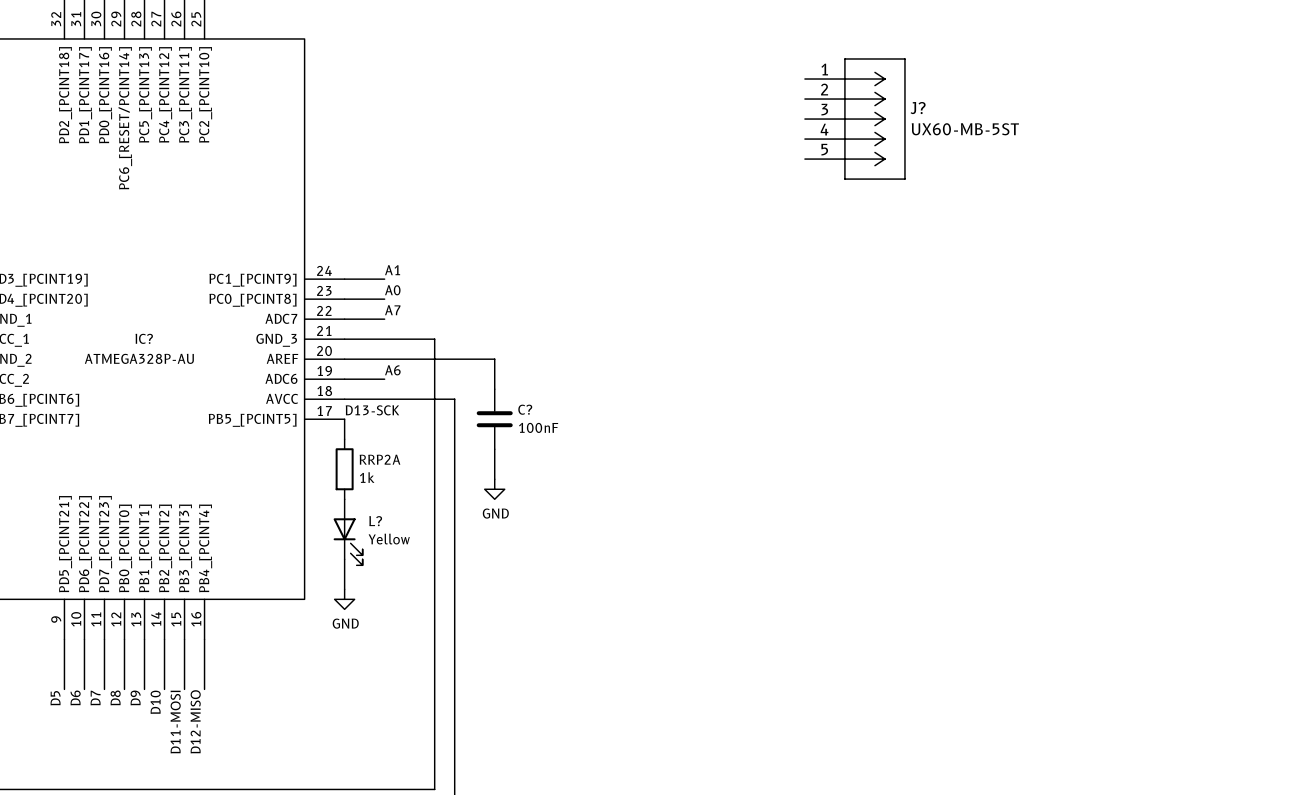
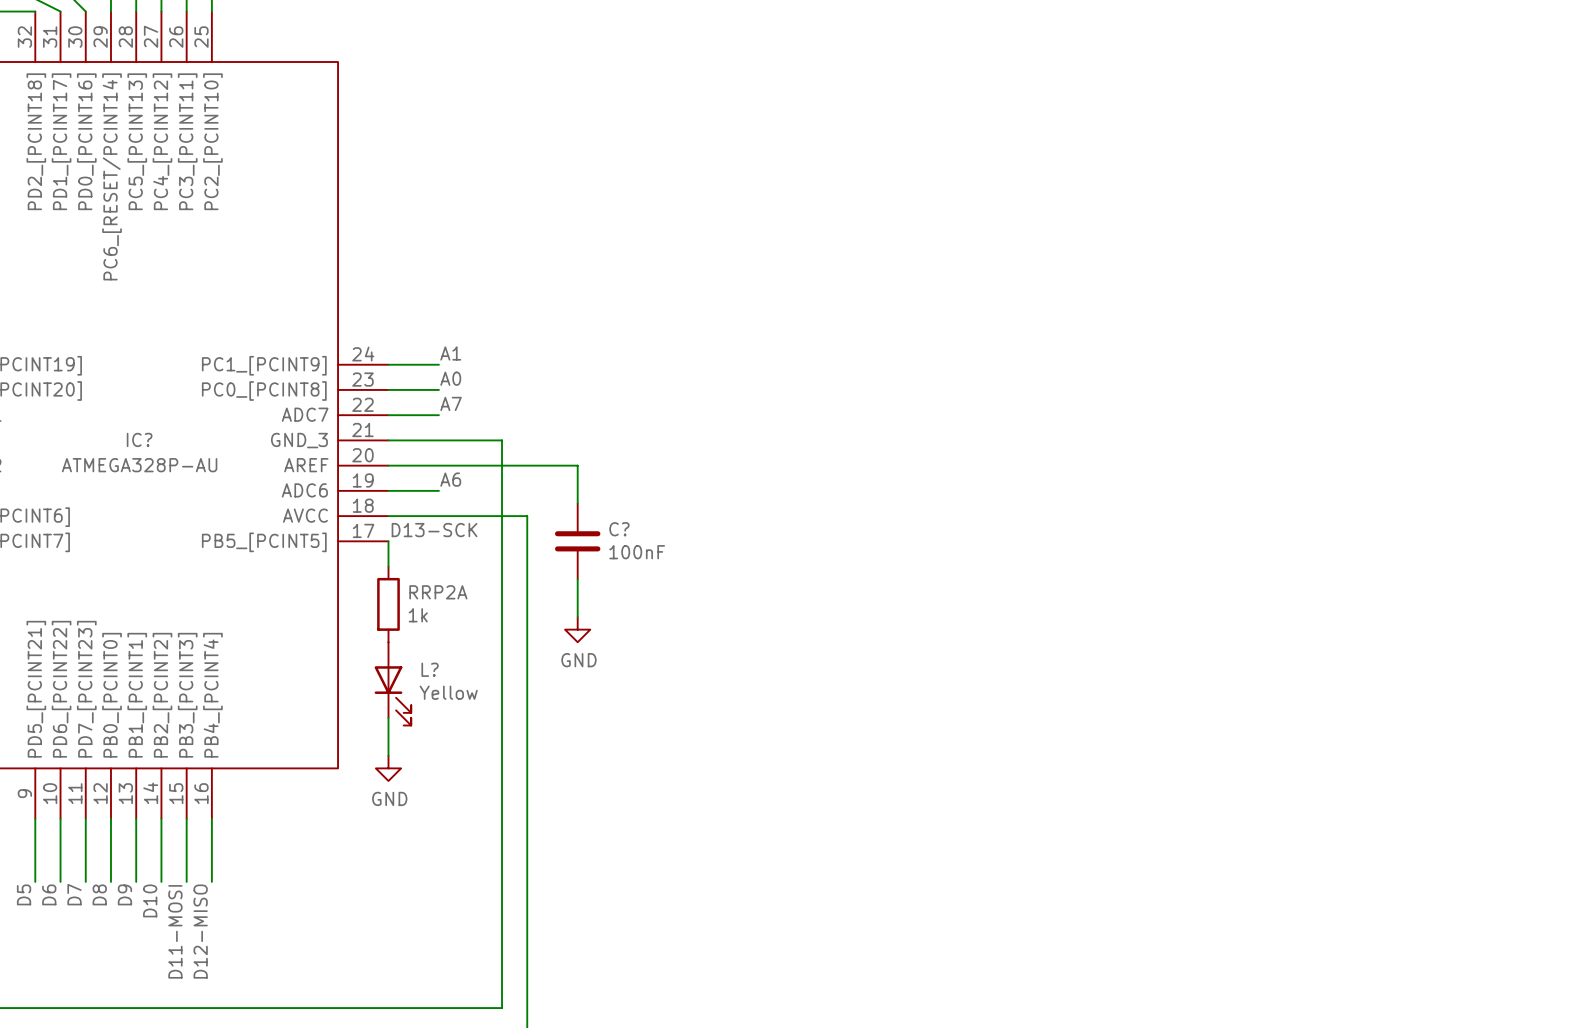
J?: UX60-MB-5ST (855, 119) -> none

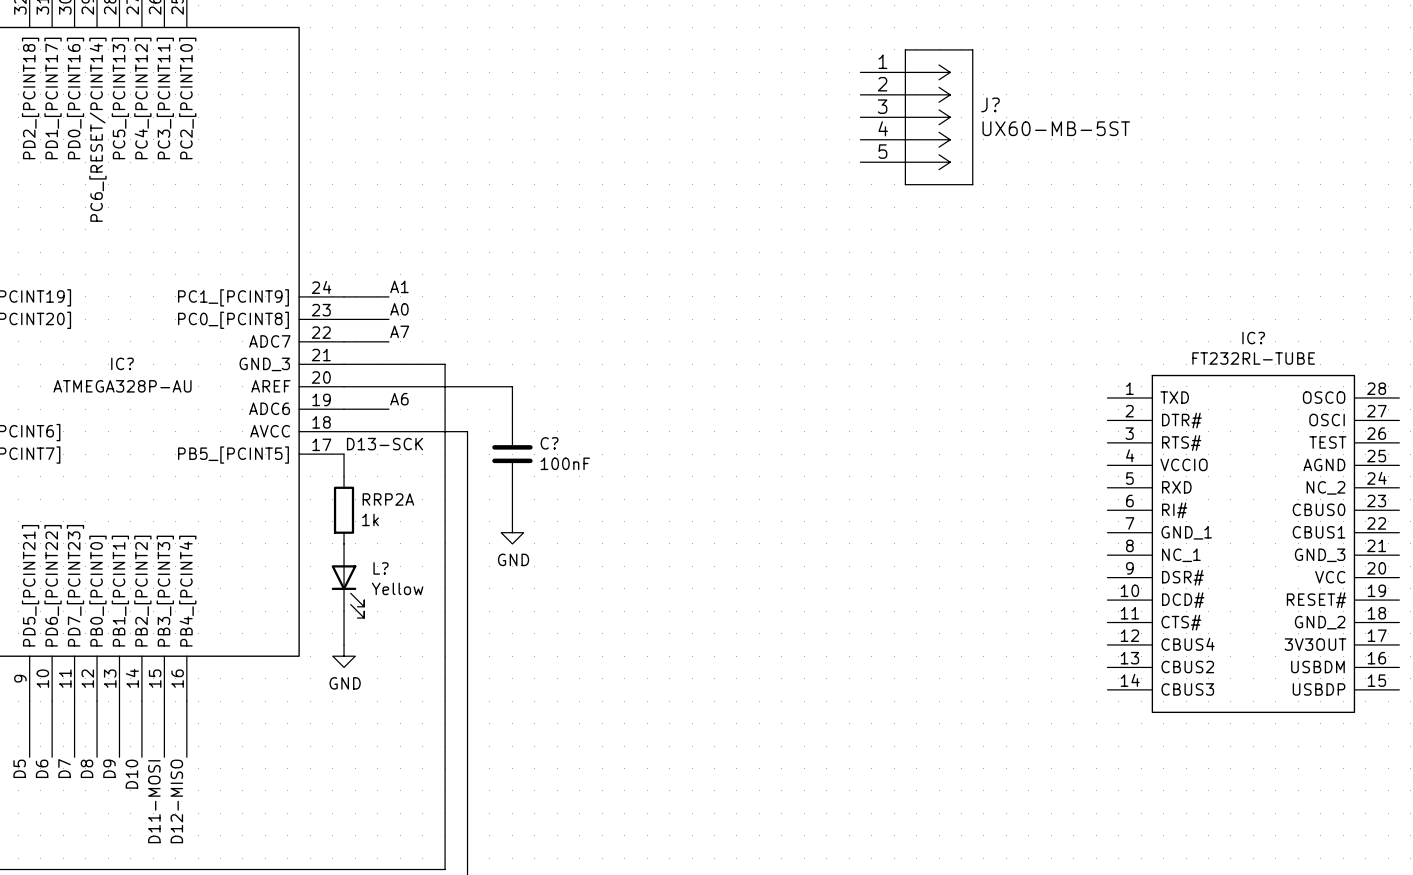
J?: none -> UX60-MB-5ST (916, 117)
IC?: none -> FT232RL-TUBE (1253, 543)

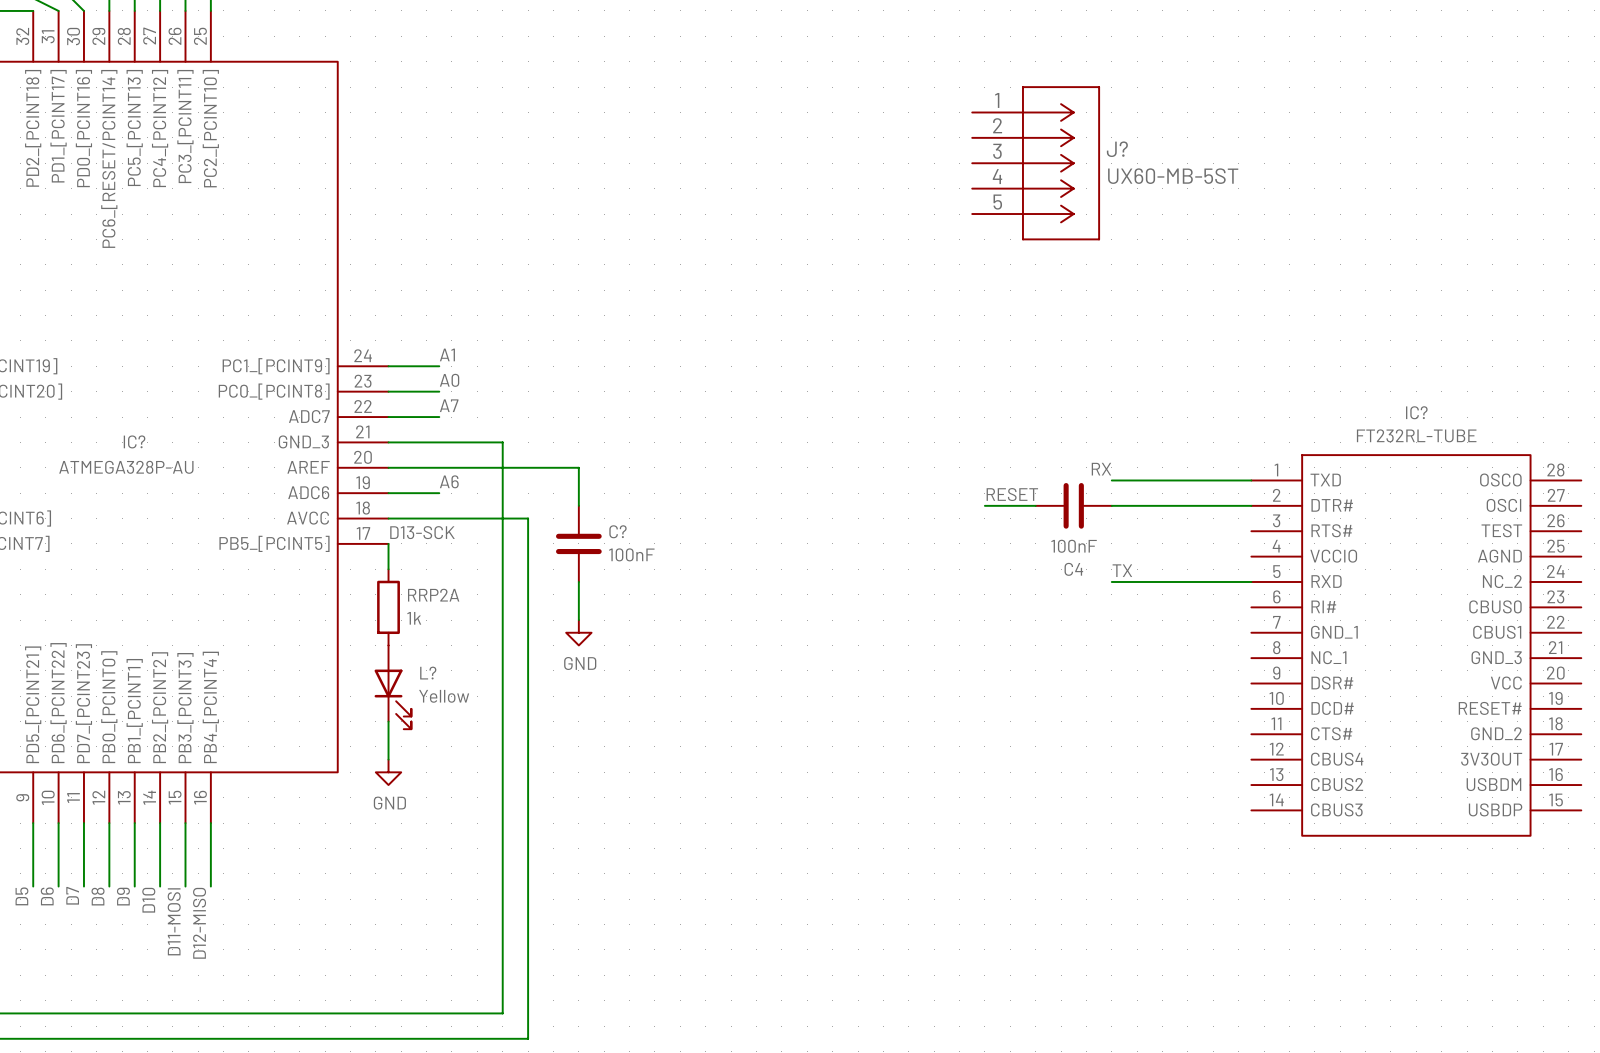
label: none -> RX (1101, 469)
wire: none -> (1111, 480) (1251, 480)
label: none -> RESET (1012, 494)
wire: none -> (984, 505) (1035, 505)
C4: none -> 100nF (1073, 505)
wire: none -> (1111, 505) (1251, 505)
label: none -> TX (1122, 570)
wire: none -> (1111, 581) (1251, 581)

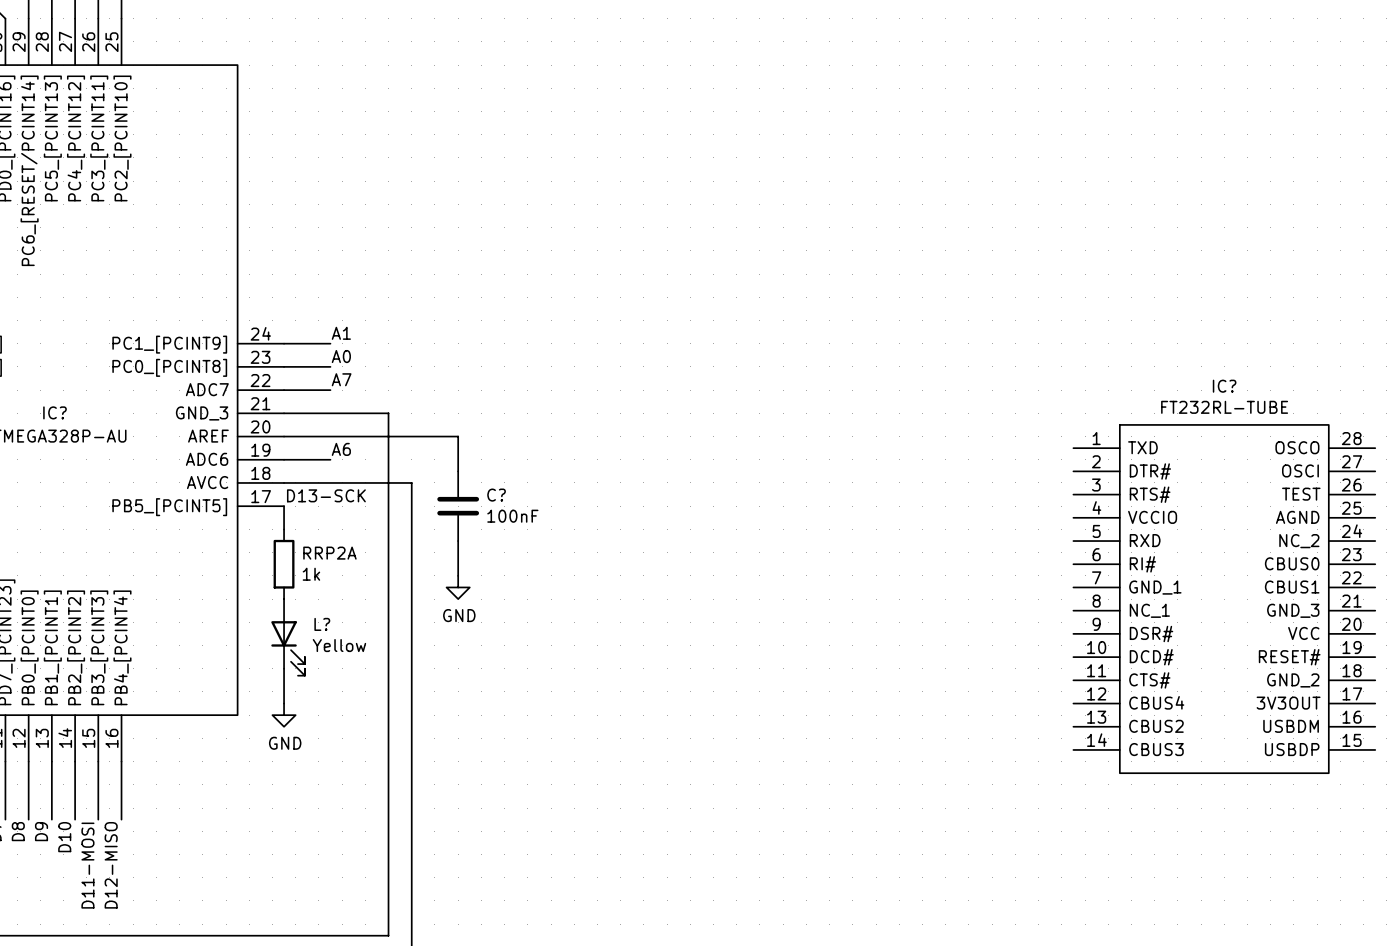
J?: UX60-MB-5ST (1035, 163) -> none
label: RX (1101, 469) -> none
wire: (1111, 480) (1251, 480) -> none
label: RESET (1012, 494) -> none
wire: (984, 505) (1035, 505) -> none
C4: 100nF (1073, 505) -> none
wire: (1111, 505) (1251, 505) -> none
label: TX (1122, 570) -> none
wire: (1111, 581) (1251, 581) -> none

